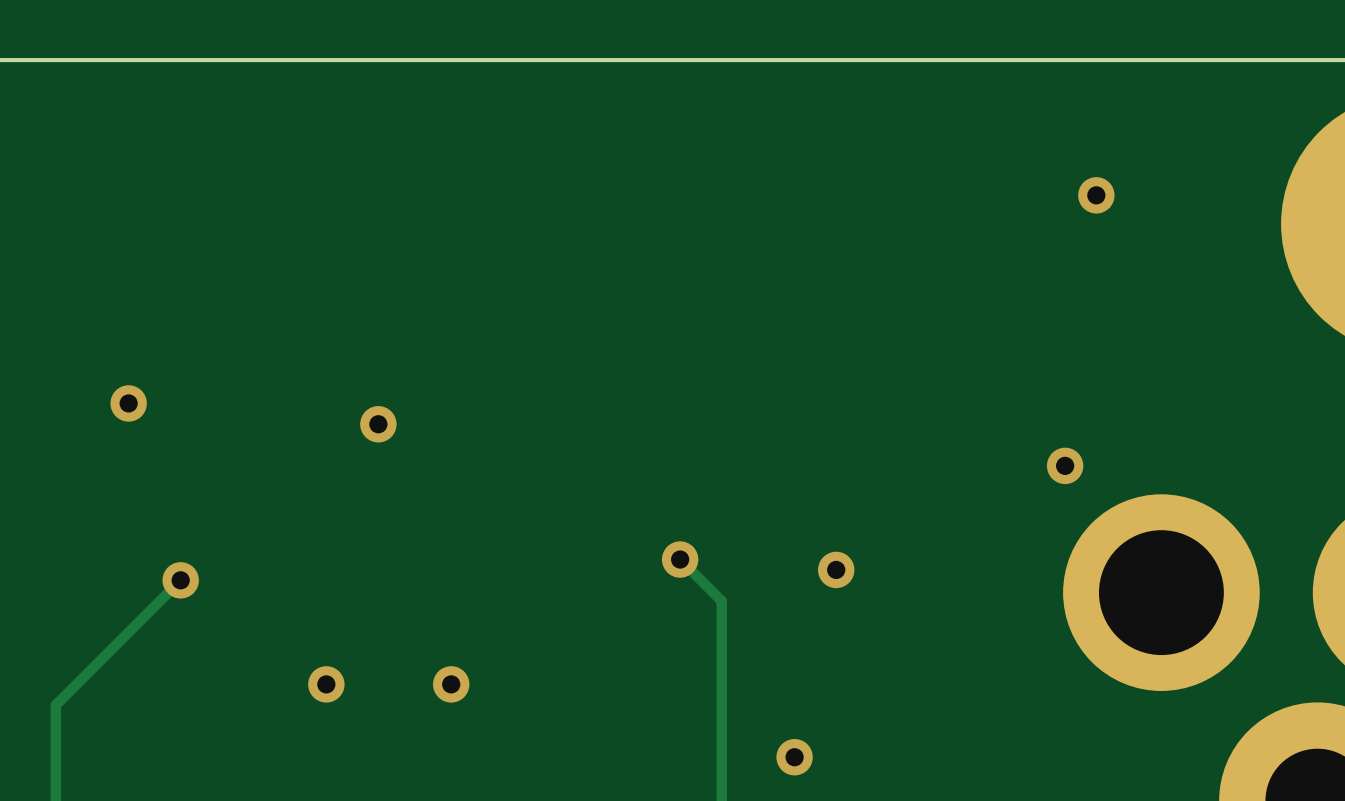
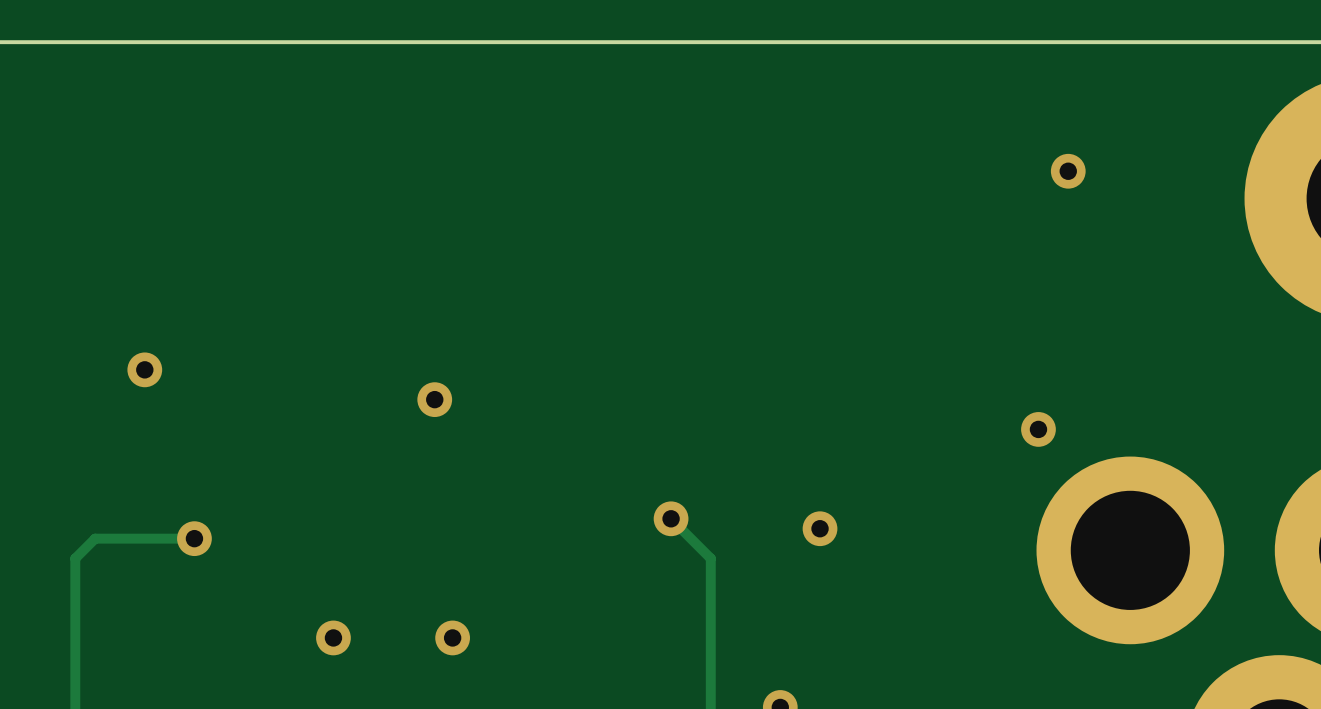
via position: (378, 424) -> (434, 399)
track: (180, 580) (55, 705) -> (194, 538) (95, 538) (75, 558) (75, 657)

